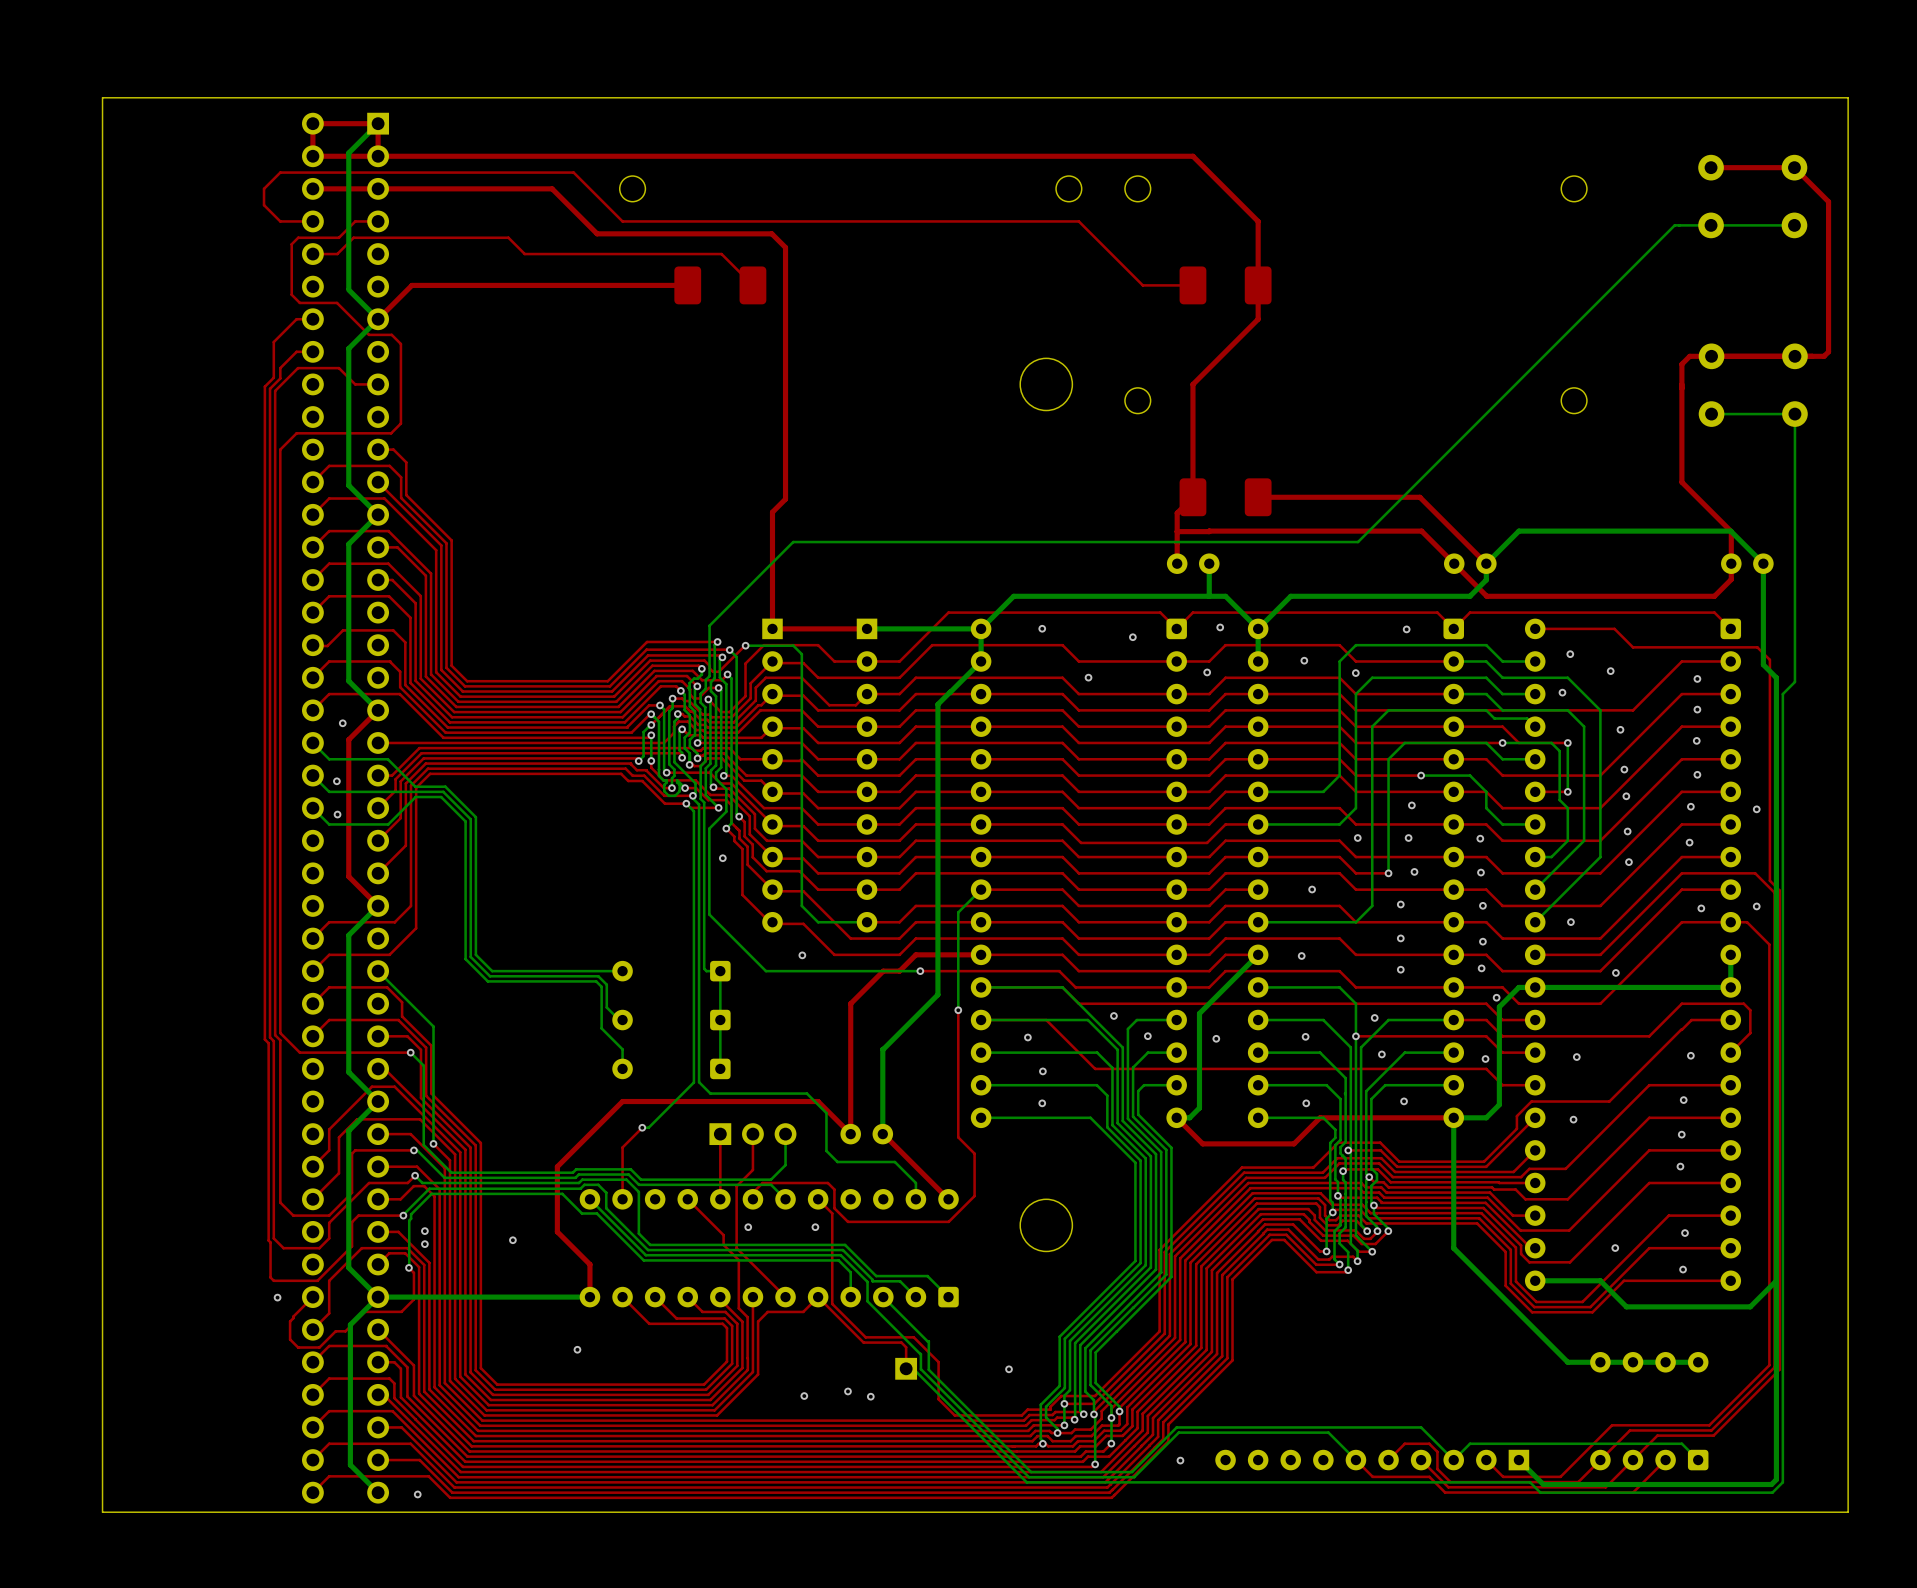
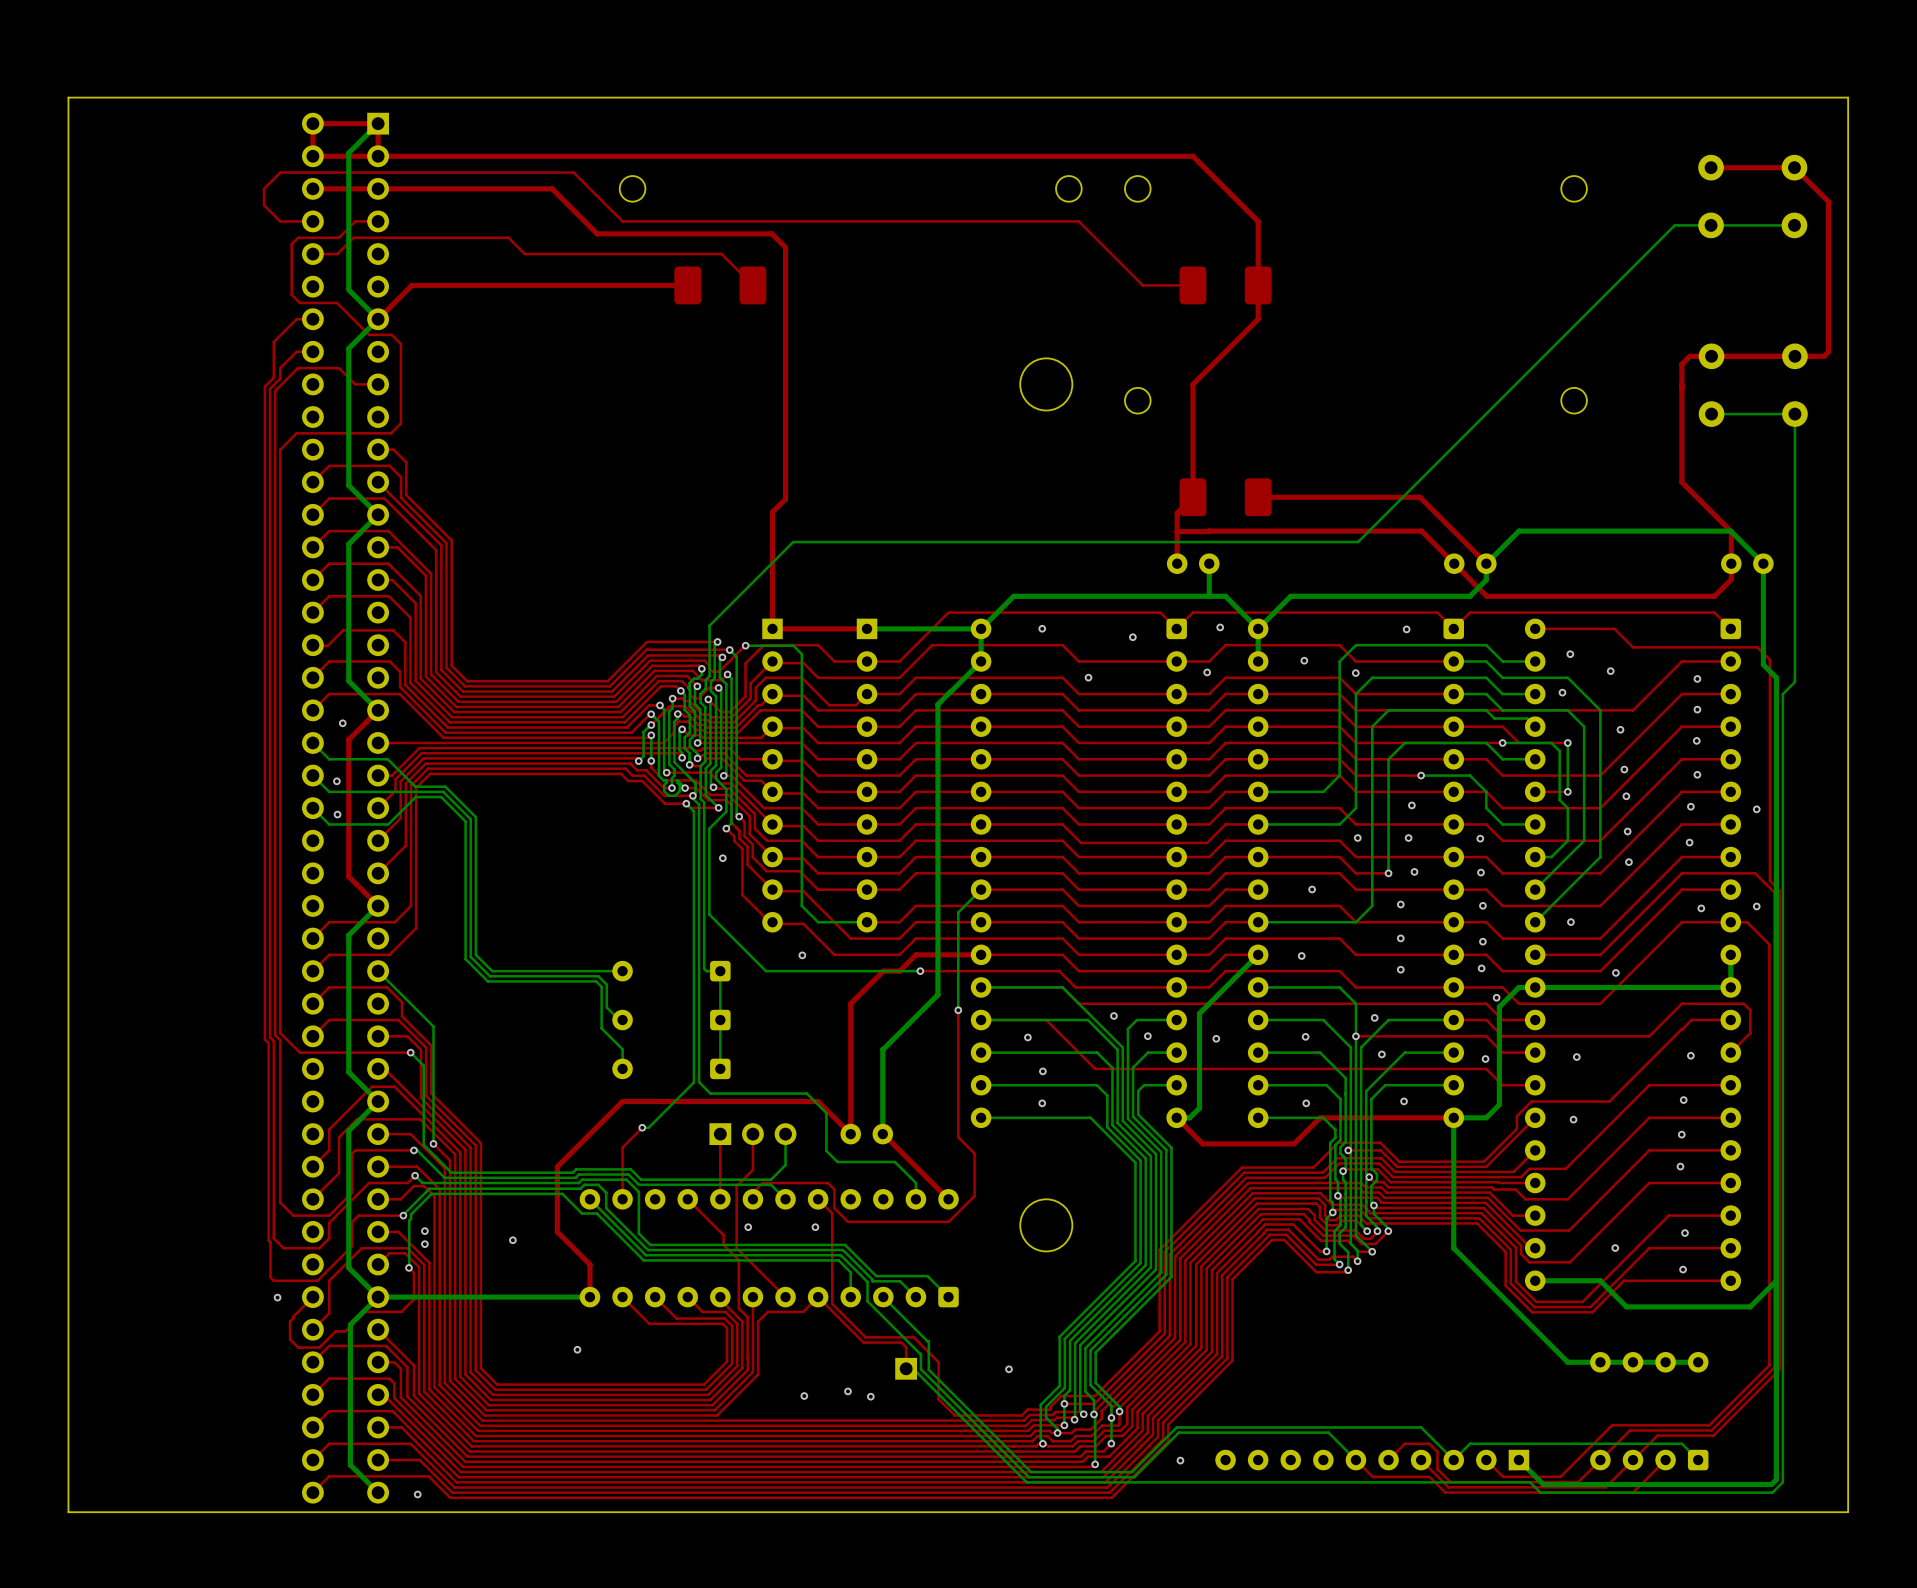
board edge: (1848, 97) (102, 97) (102, 1512) -> (1848, 97) (68, 97) (68, 1512) (102, 1512)

